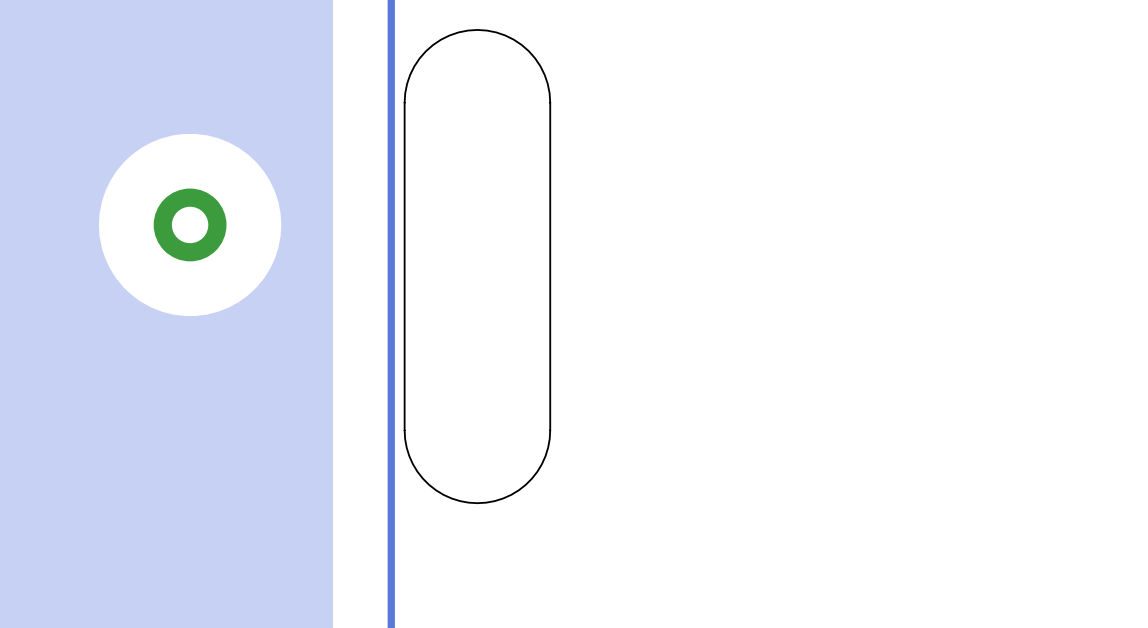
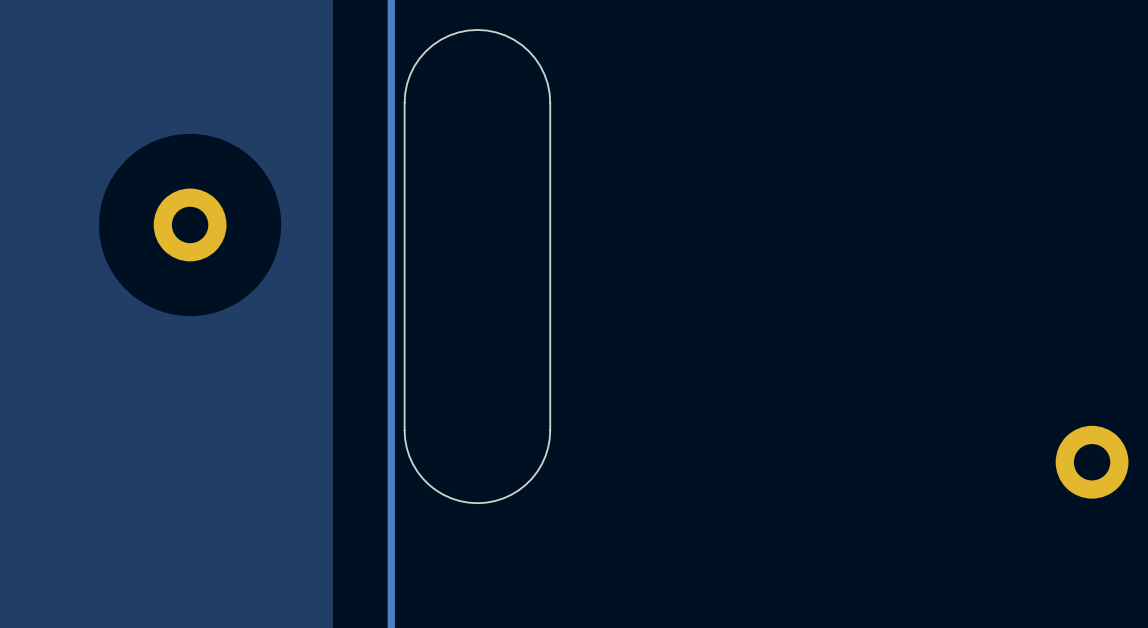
part: none -> (1092, 462)

